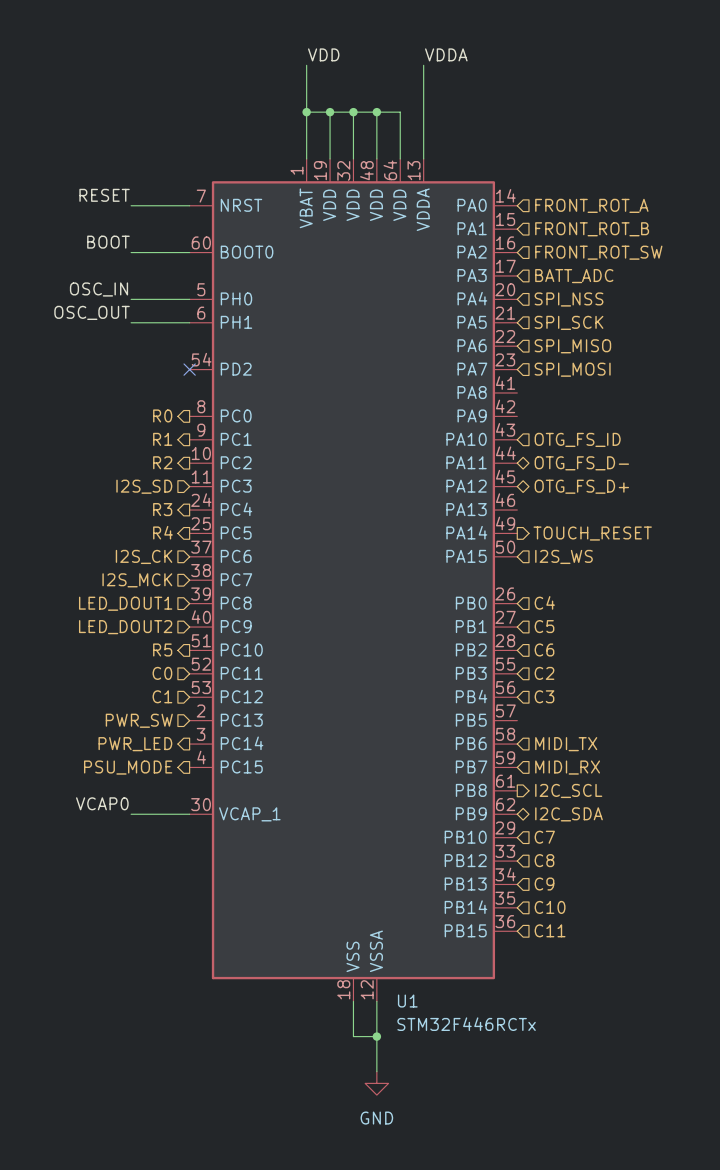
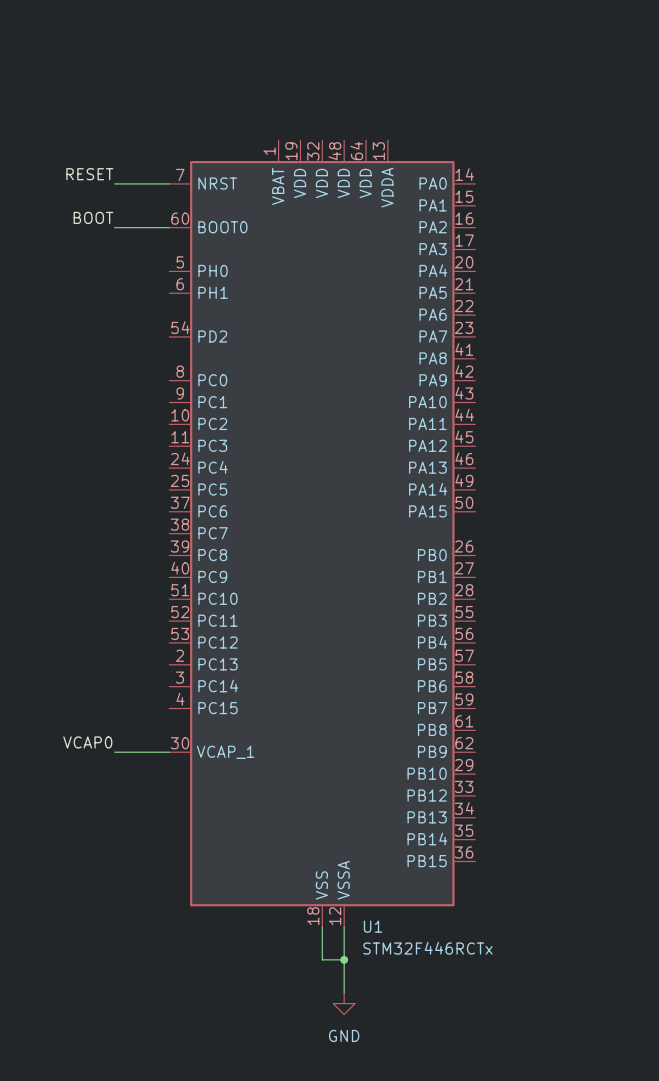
label: VDD (323, 54) -> none
label: VDDA (446, 54) -> none
wire: (306, 65) (306, 158) -> none
wire: (423, 65) (423, 158) -> none
wire: (306, 112) (400, 112) (400, 158) -> none
junction: (306, 112) -> none
wire: (330, 112) (330, 158) -> none
junction: (330, 112) -> none
wire: (353, 112) (353, 158) -> none
junction: (353, 112) -> none
wire: (376, 112) (376, 158) -> none
junction: (376, 112) -> none
hierarchical label: FRONT_ROT_A (591, 205) -> none
hierarchical label: FRONT_ROT_B (592, 229) -> none
hierarchical label: FRONT_ROT_SW (598, 252) -> none
hierarchical label: BATT_ADC (574, 276) -> none
label: OSC_IN (98, 289) -> none
wire: (131, 299) (189, 299) -> none
hierarchical label: SPI_NSS (569, 299) -> none
label: OSC_OUT (92, 312) -> none
wire: (131, 322) (189, 322) -> none
hierarchical label: SPI_SCK (569, 322) -> none
hierarchical label: SPI_MISO (572, 346) -> none
no-connect mark: (189, 369) -> none
hierarchical label: SPI_MOSI (572, 369) -> none
hierarchical label: R0 (162, 415) -> none
hierarchical label: R1 (162, 439) -> none
hierarchical label: OTG_FS_ID (577, 439) -> none
hierarchical label: R2 (162, 462) -> none
hierarchical label: OTG_FS_D- (581, 463) -> none
hierarchical label: I2S_SD (144, 486) -> none
hierarchical label: OTG_FS_D+ (581, 486) -> none
hierarchical label: R3 (162, 509) -> none
hierarchical label: R4 (162, 532) -> none
hierarchical label: TOUCH_RESET (592, 533) -> none
hierarchical label: I2S_CK (144, 556) -> none
hierarchical label: I2S_WS (563, 556) -> none
hierarchical label: I2S_MCK (137, 580) -> none
hierarchical label: C4 (544, 602) -> none
hierarchical label: LED_DOUT1 (125, 603) -> none
hierarchical label: C5 (544, 626) -> none
hierarchical label: LED_DOUT2 (125, 627) -> none
hierarchical label: R5 (162, 649) -> none
hierarchical label: C6 (544, 649) -> none
hierarchical label: C0 (162, 673) -> none
hierarchical label: C2 (544, 673) -> none
hierarchical label: C1 (162, 696) -> none
hierarchical label: C3 (544, 696) -> none
hierarchical label: PWR_SW (139, 720) -> none
hierarchical label: PWR_LED (135, 744) -> none
hierarchical label: MIDI_TX (566, 744) -> none
hierarchical label: PSU_MODE (128, 767) -> none
hierarchical label: MIDI_RX (567, 767) -> none
hierarchical label: I2C_SCL (568, 790) -> none
hierarchical label: I2C_SDA (569, 814) -> none
hierarchical label: C7 (544, 837) -> none
hierarchical label: C8 (544, 860) -> none
hierarchical label: C9 (544, 884) -> none
hierarchical label: C10 (550, 907) -> none
hierarchical label: C11 (550, 930) -> none

